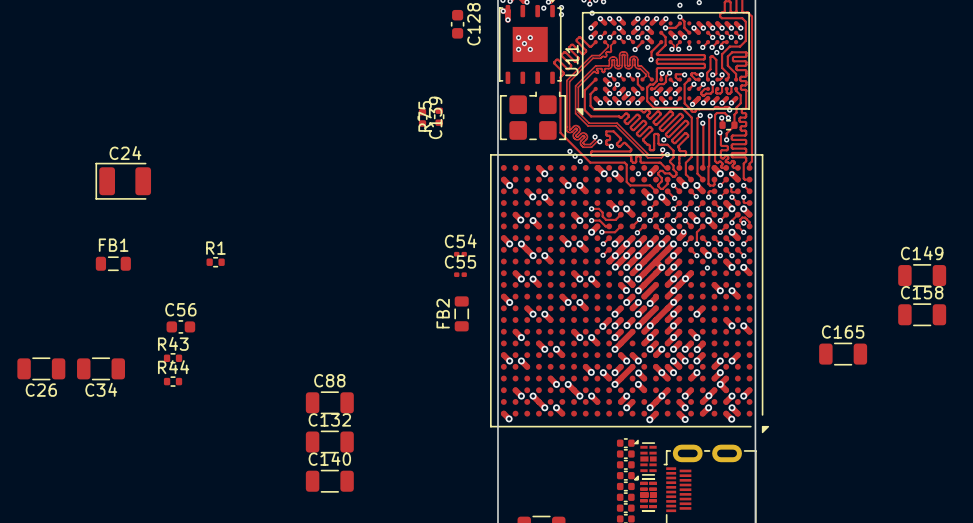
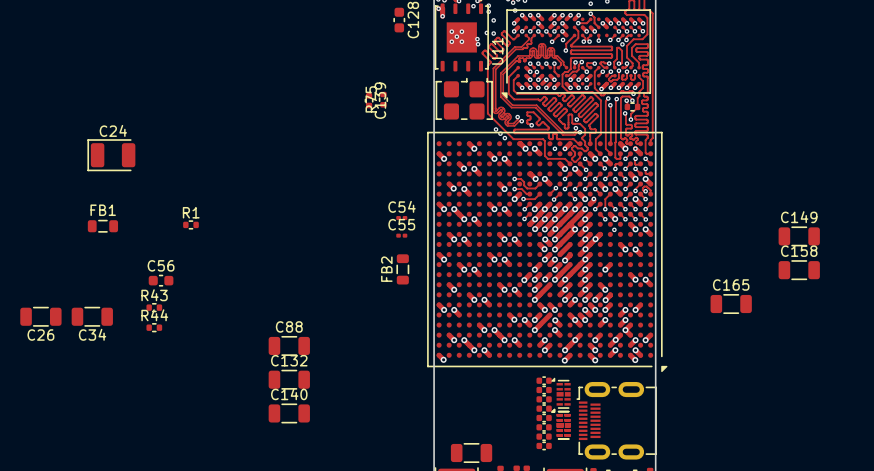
via: none -> (493, 20)
via: none -> (486, 32)
via: none -> (493, 33)
via: none -> (477, 39)
via: none -> (478, 44)

